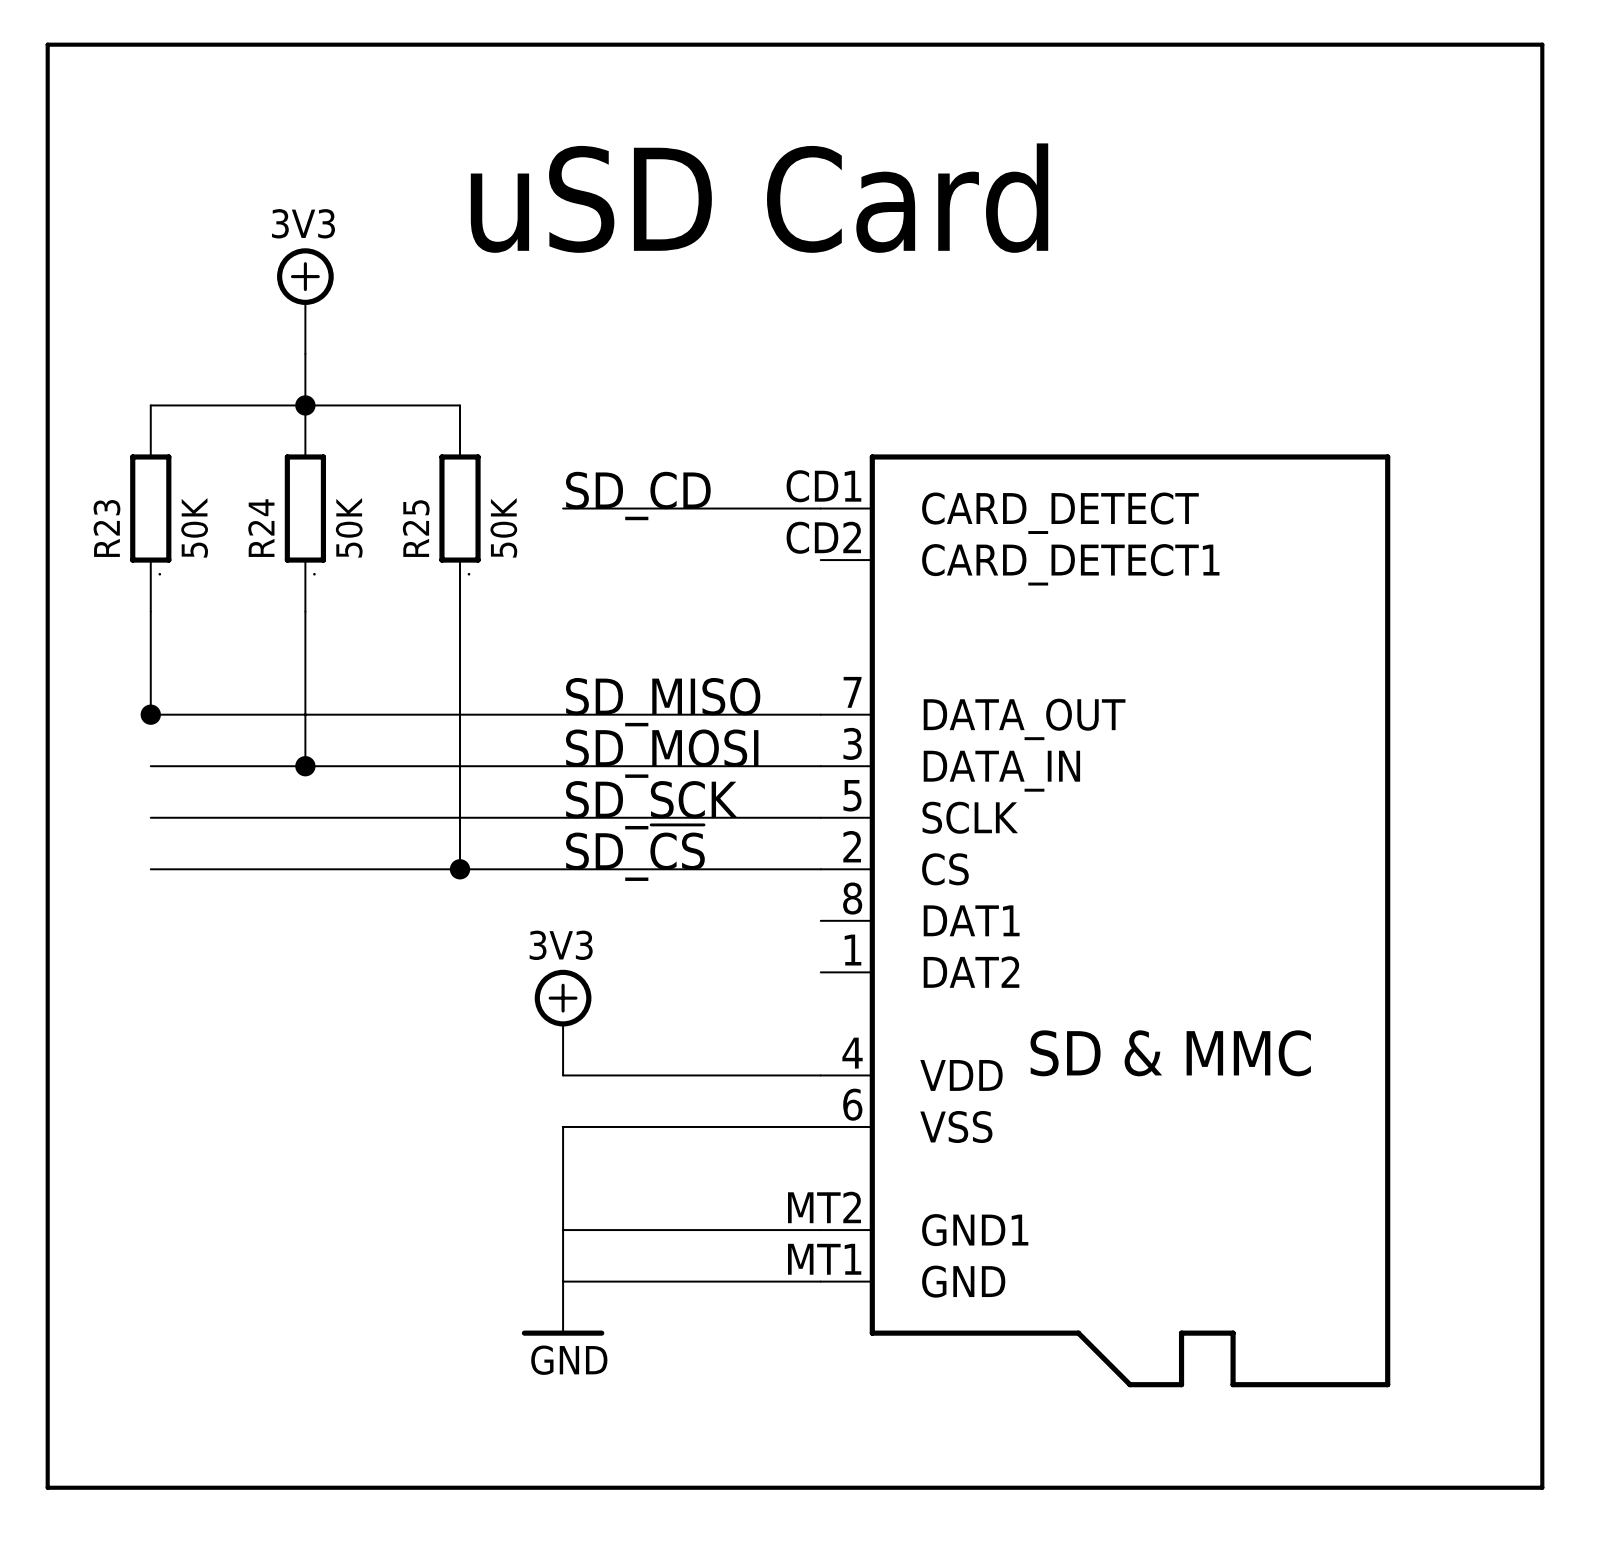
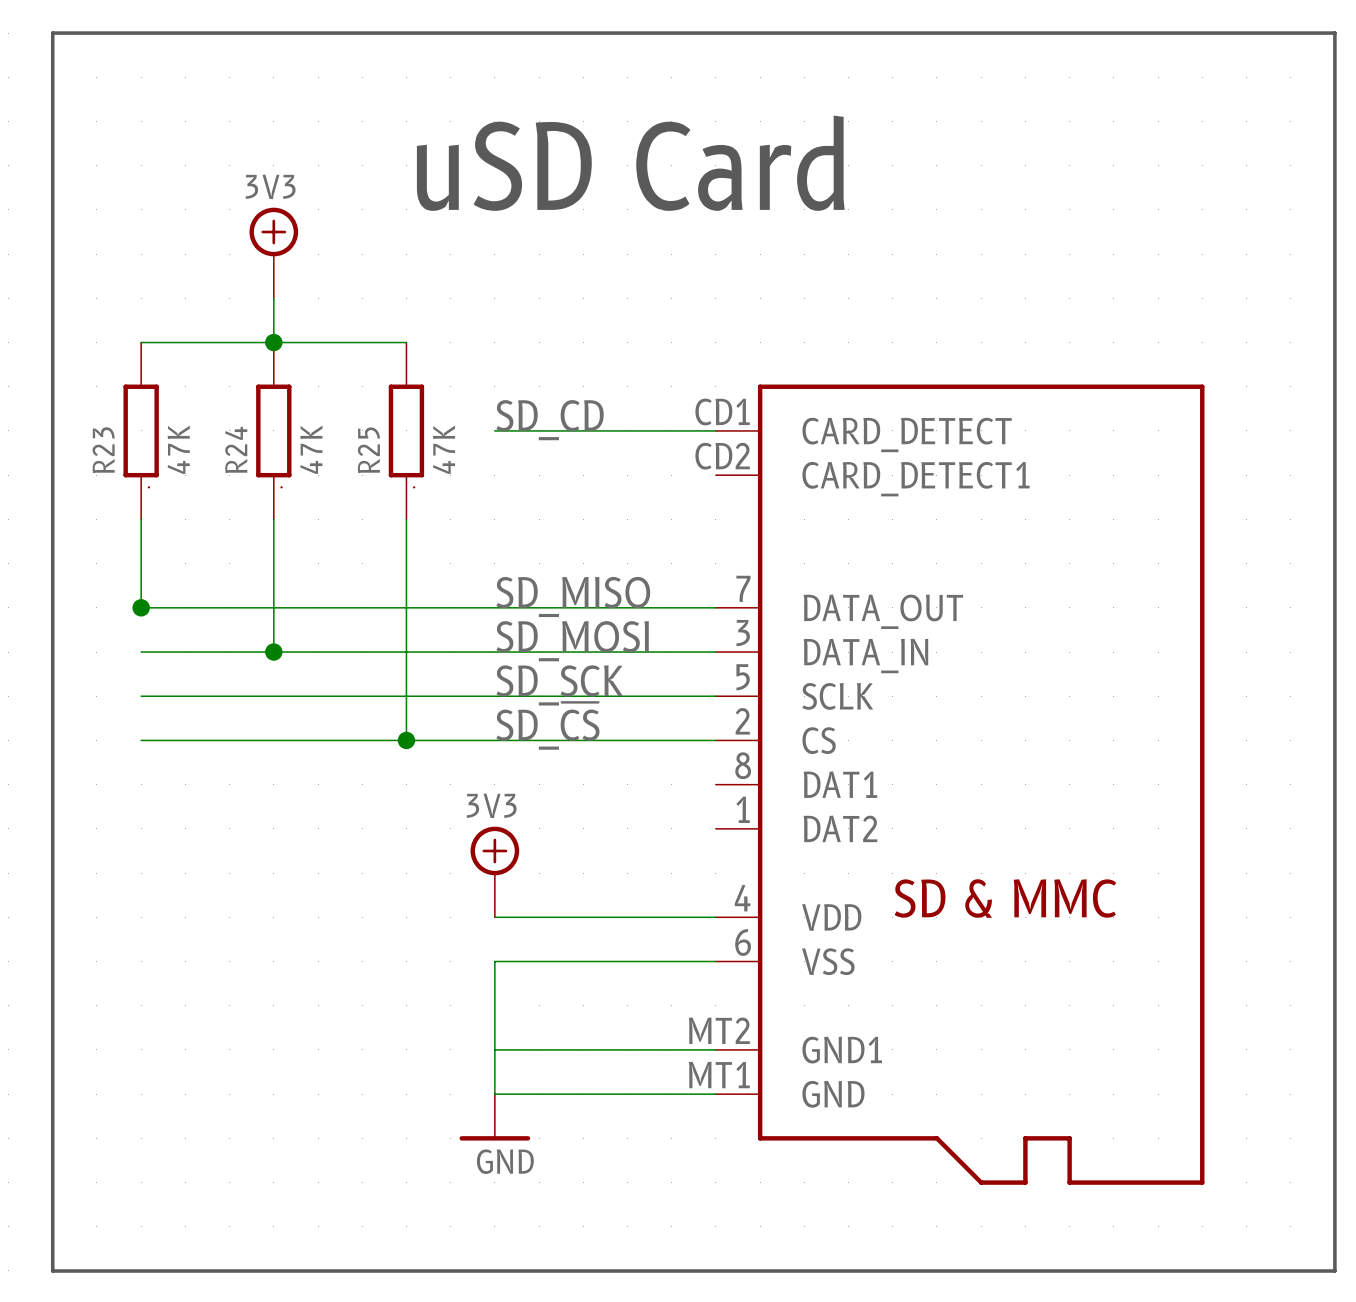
R23 value: 50K (194, 527) -> 47K (178, 449)
R24 value: 50K (349, 527) -> 47K (311, 449)
R25 value: 50K (503, 527) -> 47K (444, 449)

